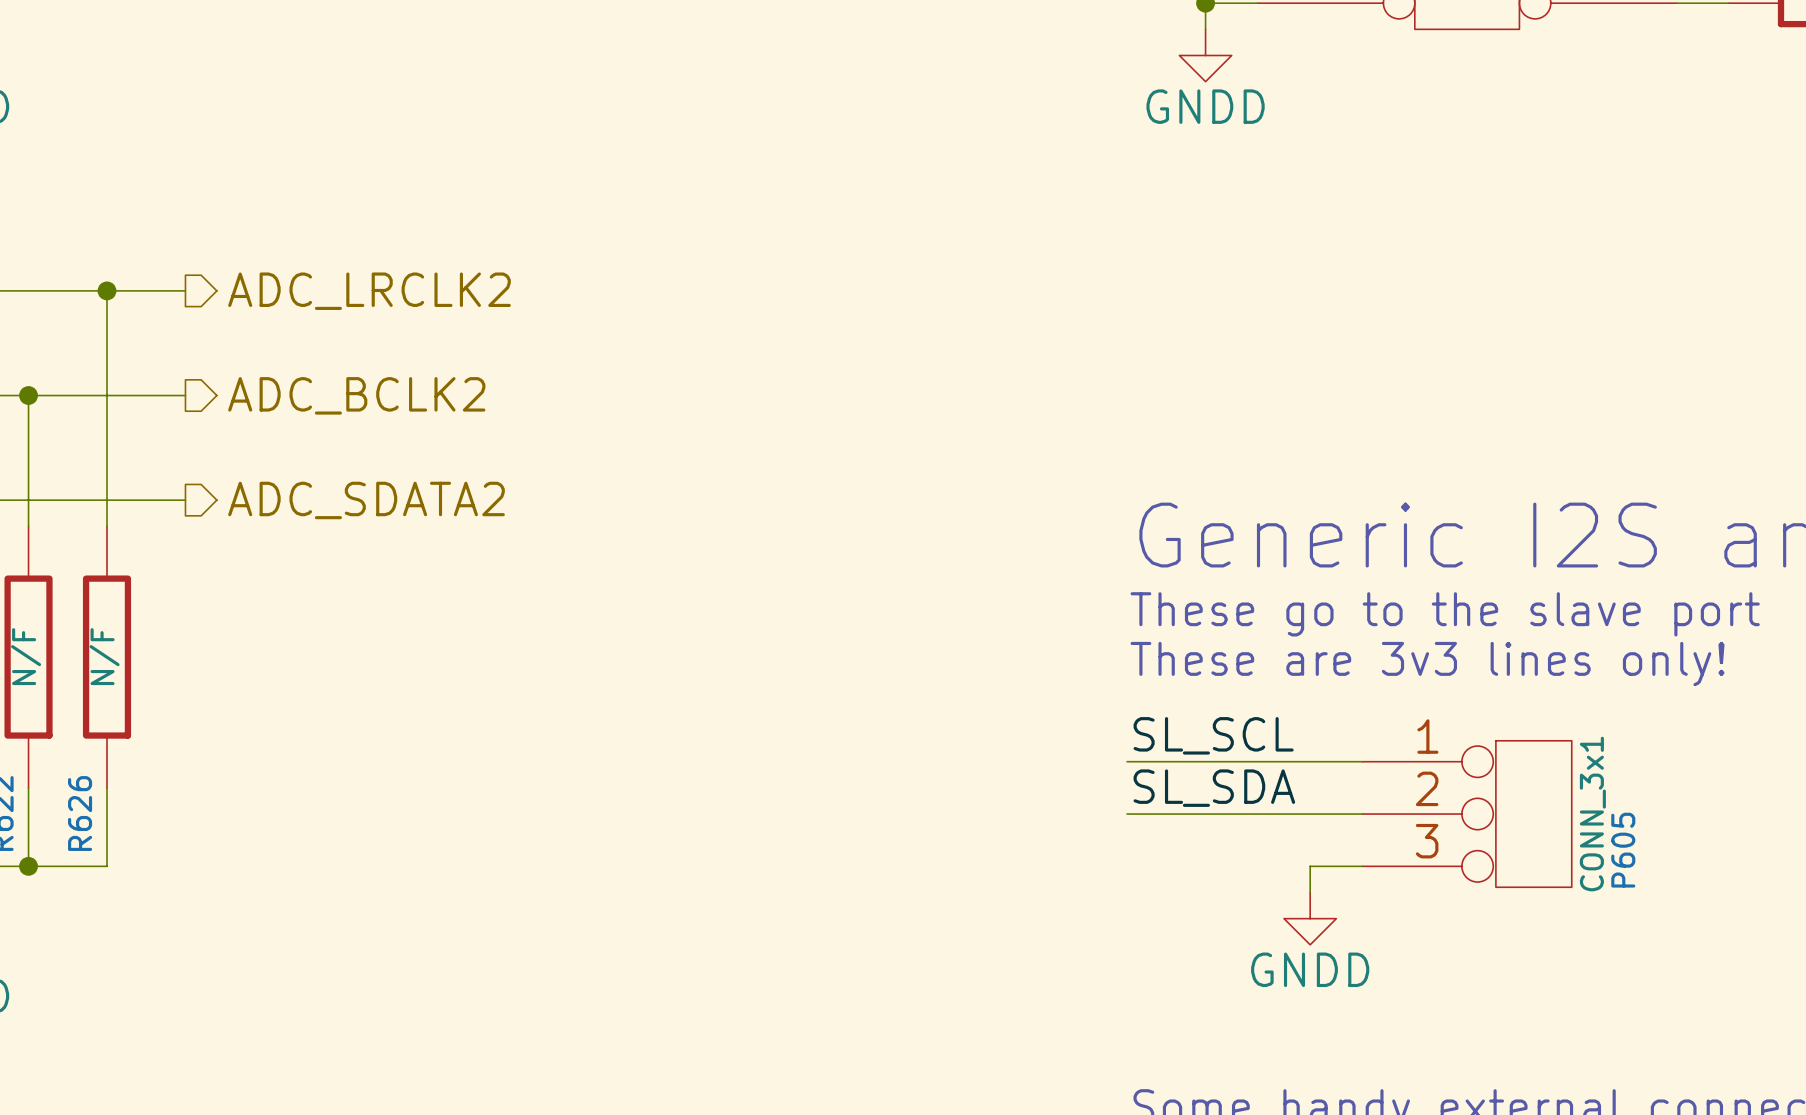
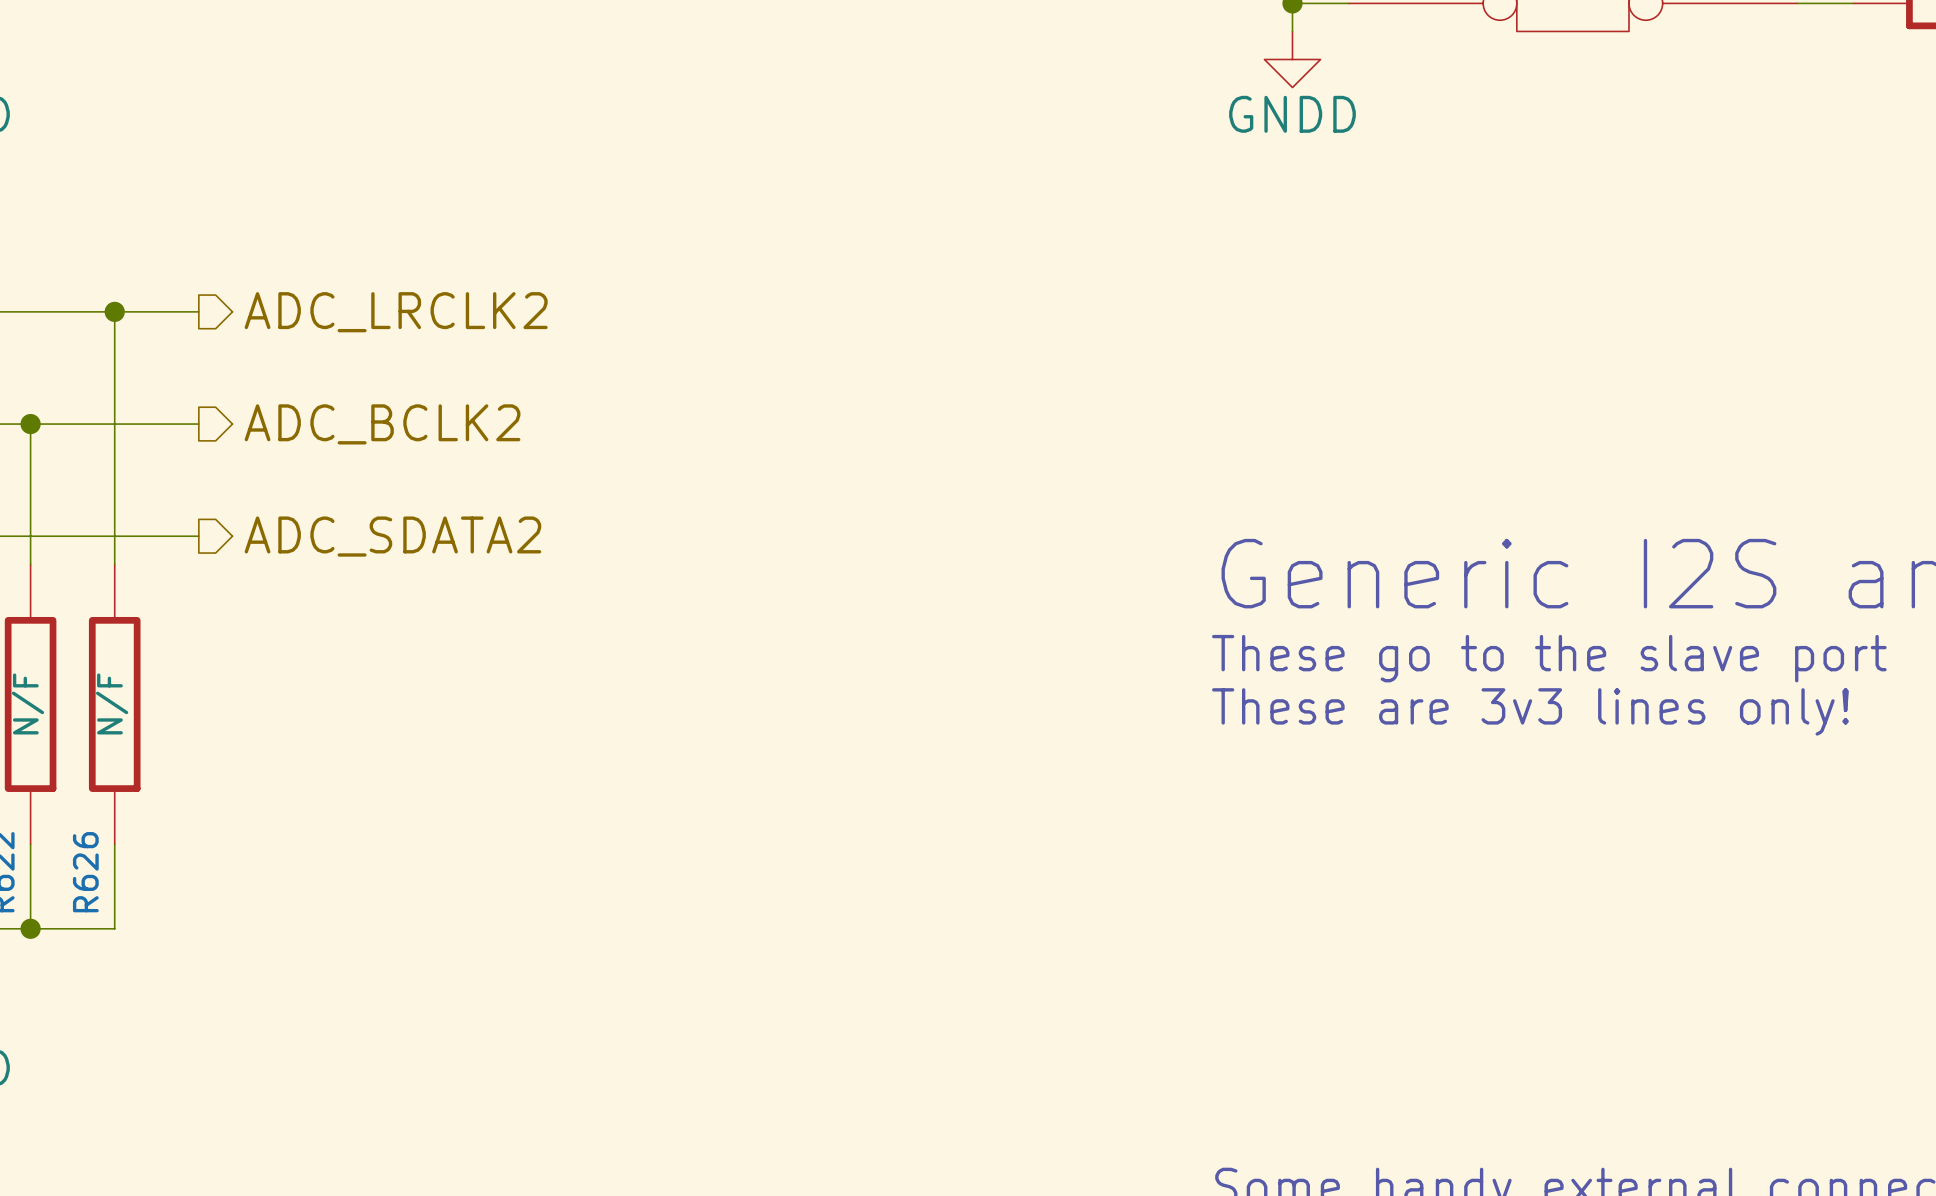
label: SL_SCL (1213, 735) -> none
wire: (1127, 761) (1362, 761) -> none
label: SL_SDA (1214, 788) -> none
wire: (1127, 814) (1362, 814) -> none
P605: CONN_3x1 (1467, 814) -> none
wire: (1362, 866) (1310, 866) (1310, 892) -> none
power symbol: GNDD (1310, 918) -> none

